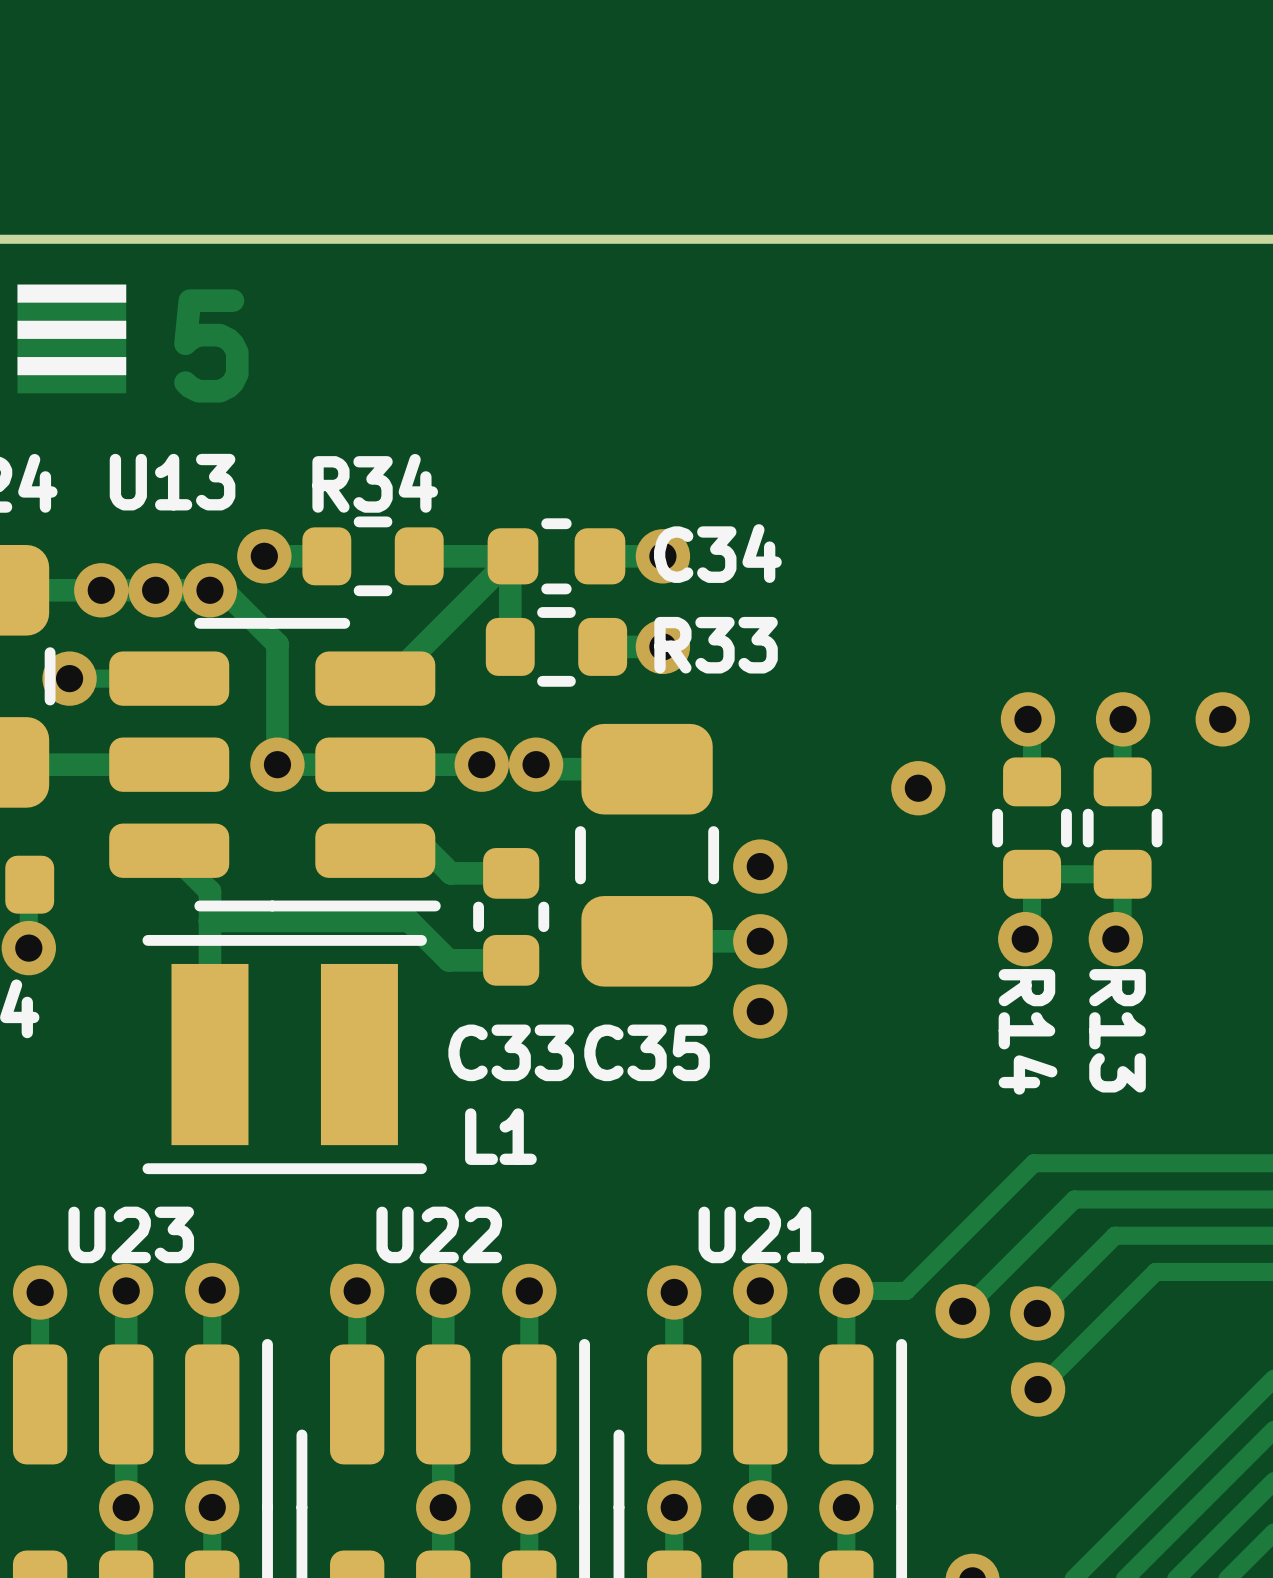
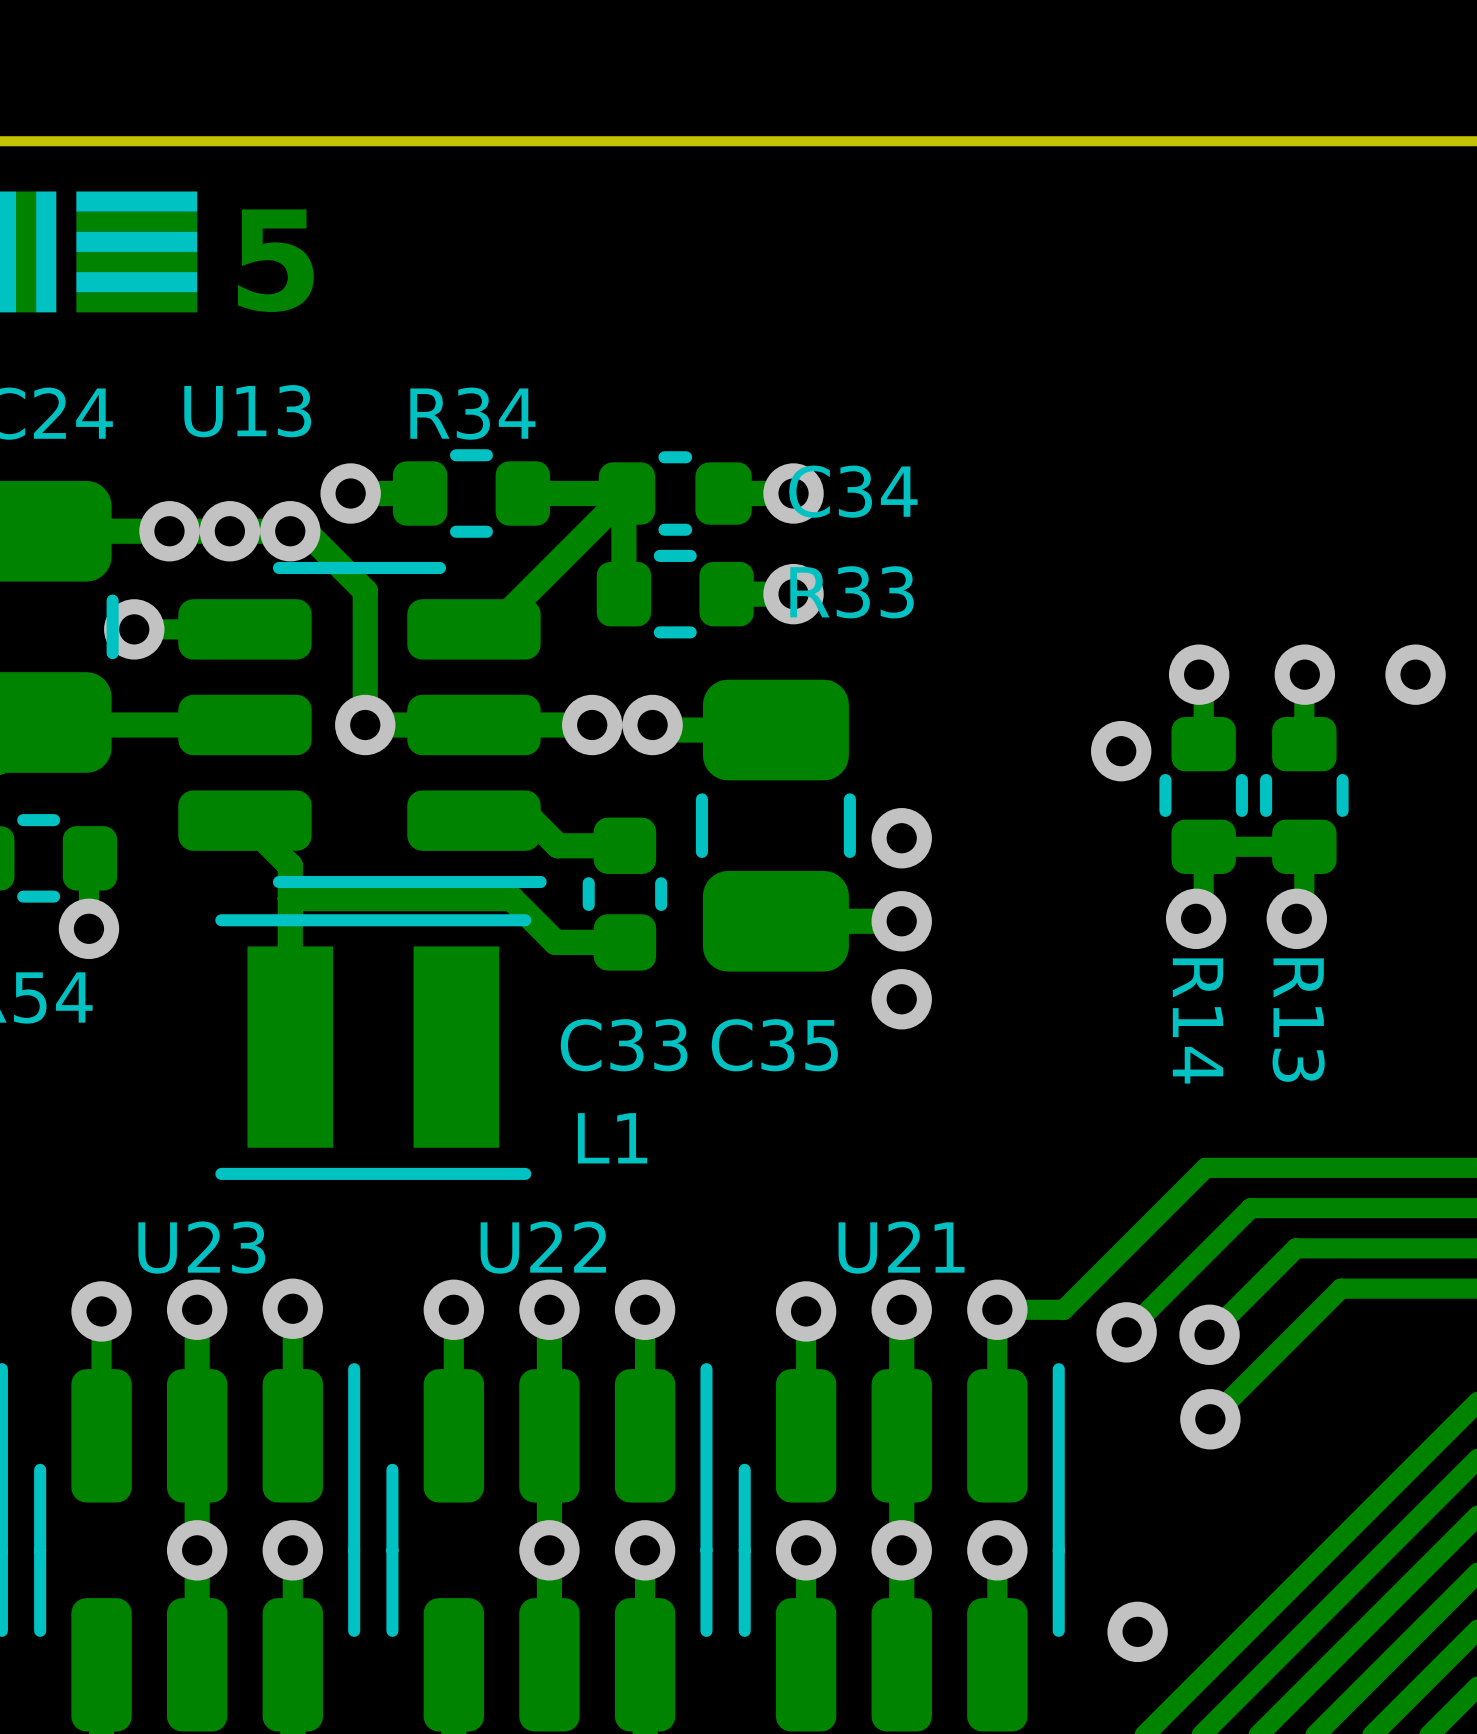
via position: (918, 788) -> (1121, 751)

